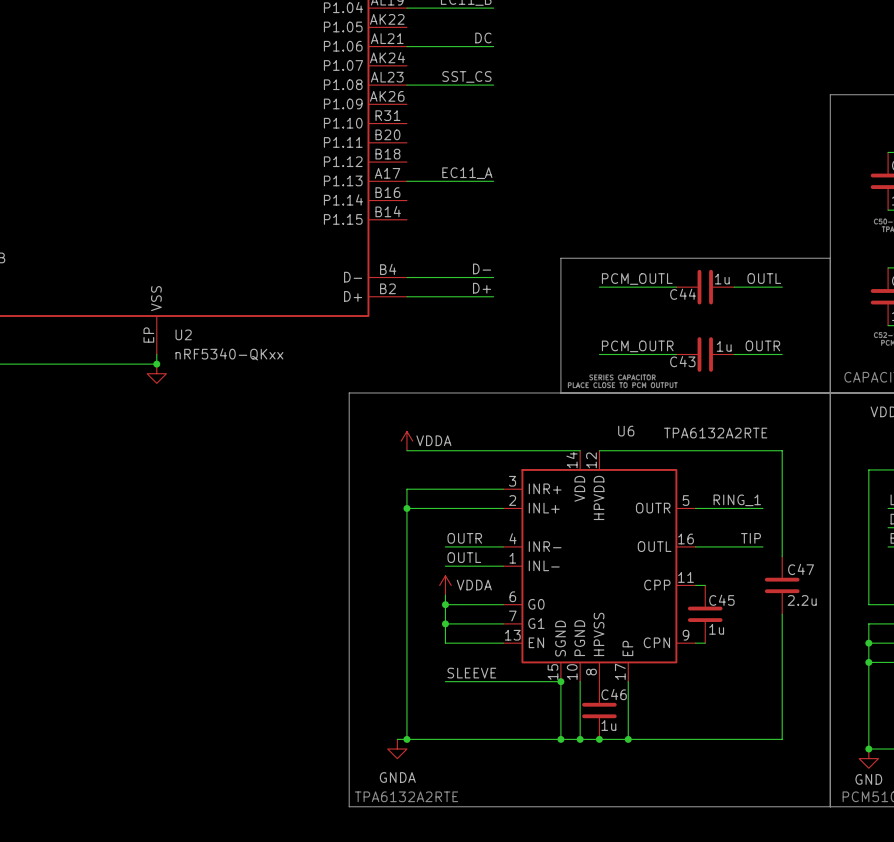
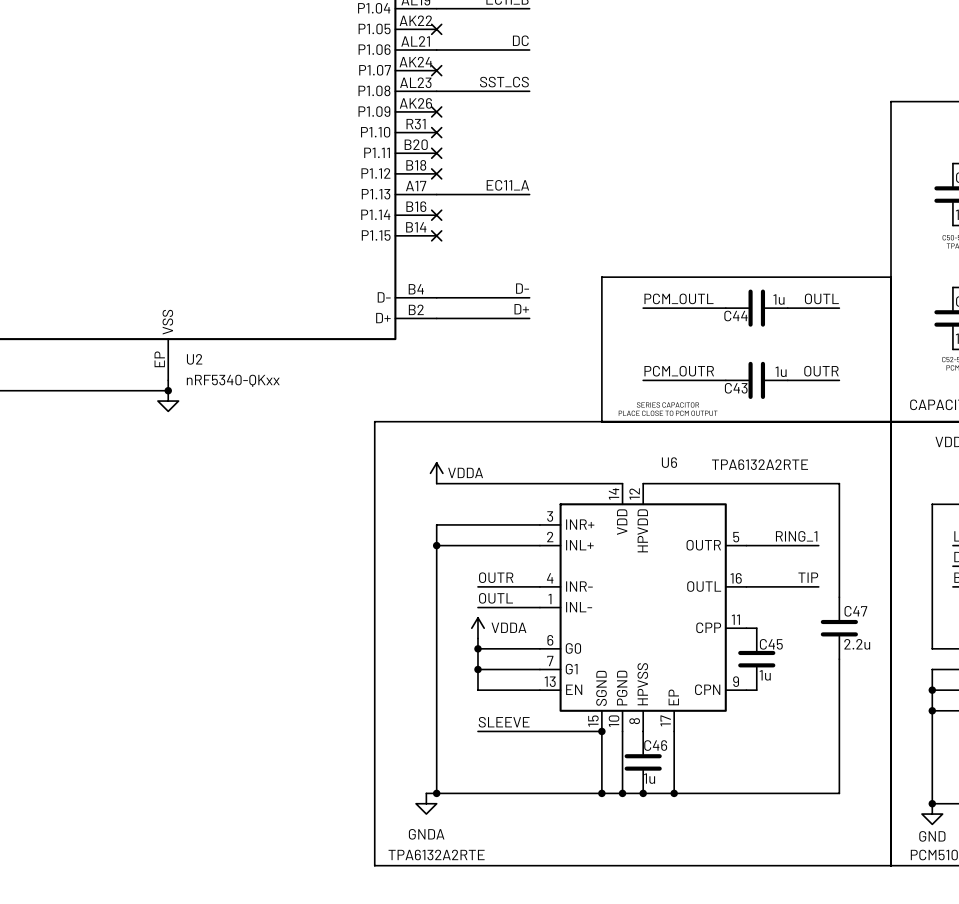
no-connect mark: none -> (436, 29)
no-connect mark: none -> (436, 70)
no-connect mark: none -> (436, 111)
no-connect mark: none -> (436, 132)
no-connect mark: none -> (436, 153)
no-connect mark: none -> (436, 173)
no-connect mark: none -> (436, 215)
no-connect mark: none -> (436, 235)

